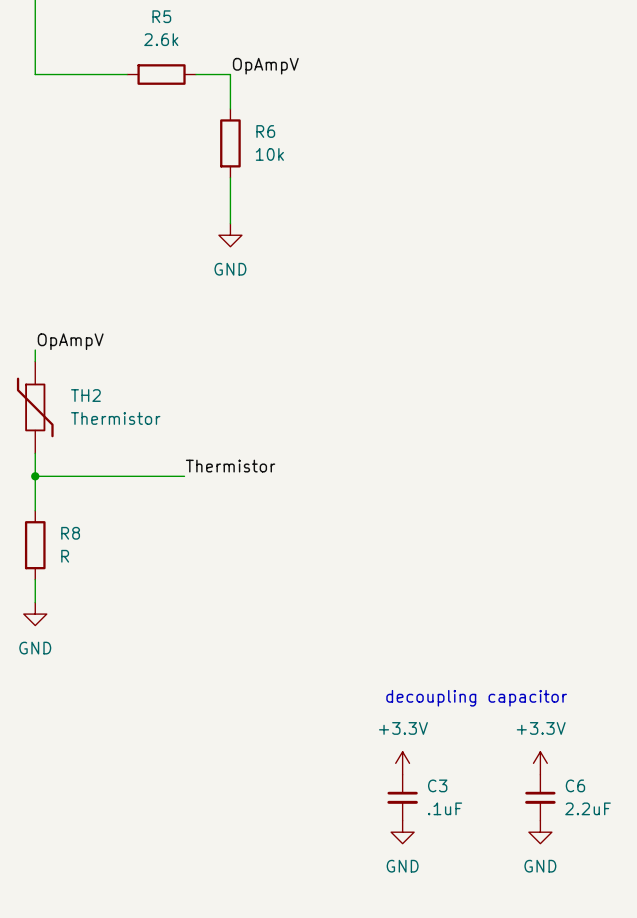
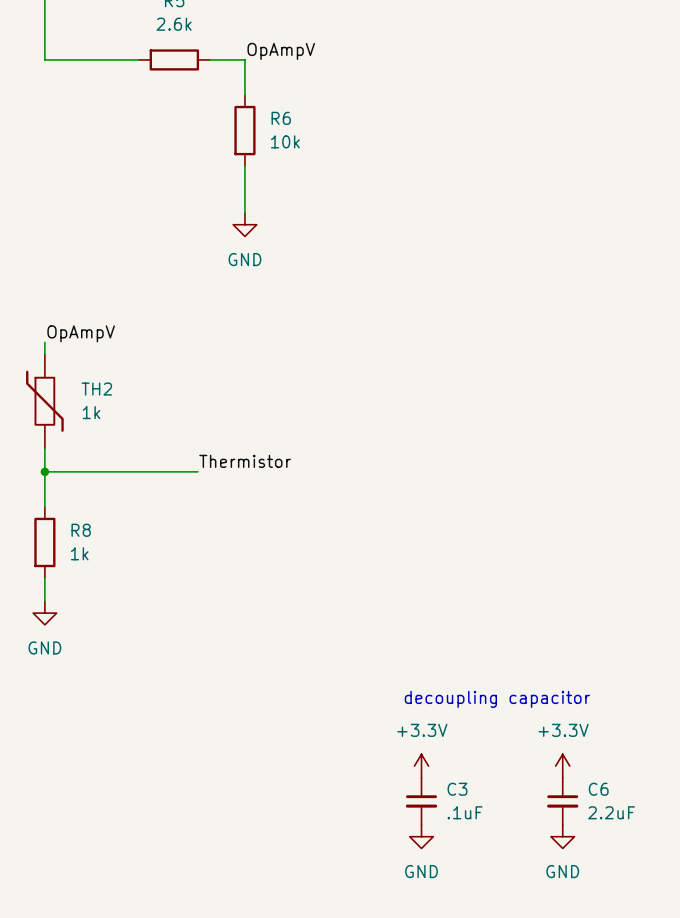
TH2 value: Thermistor (115, 418) -> 1k (91, 412)
R8 value: R (65, 556) -> 1k (79, 553)

